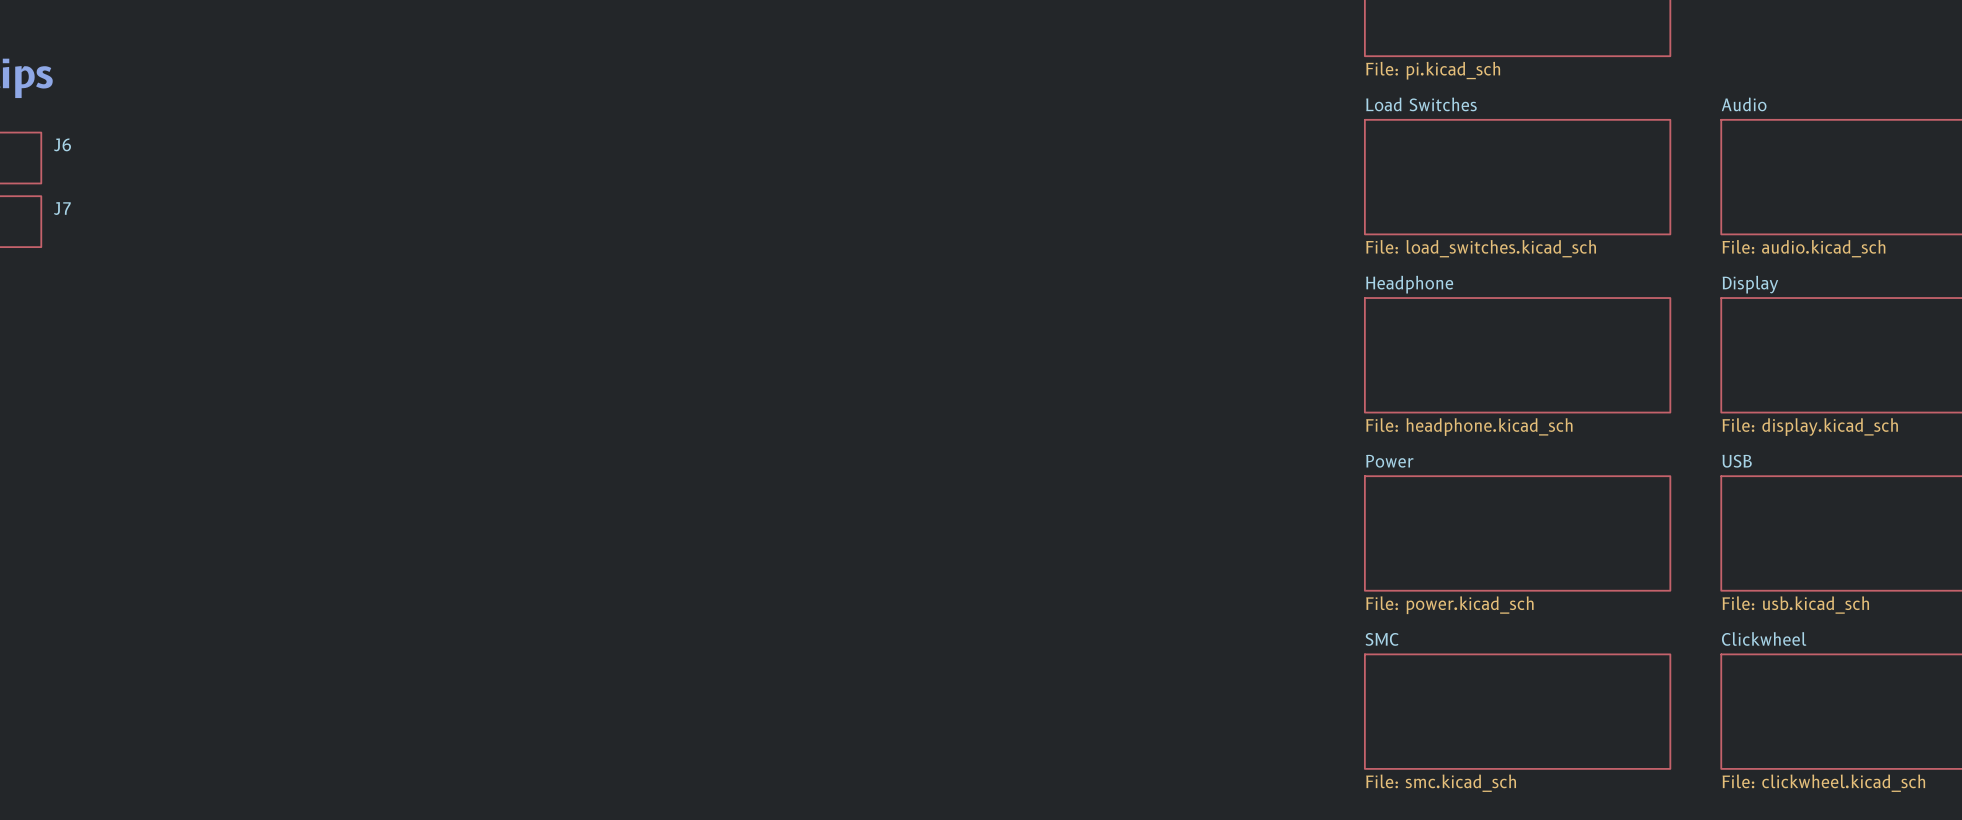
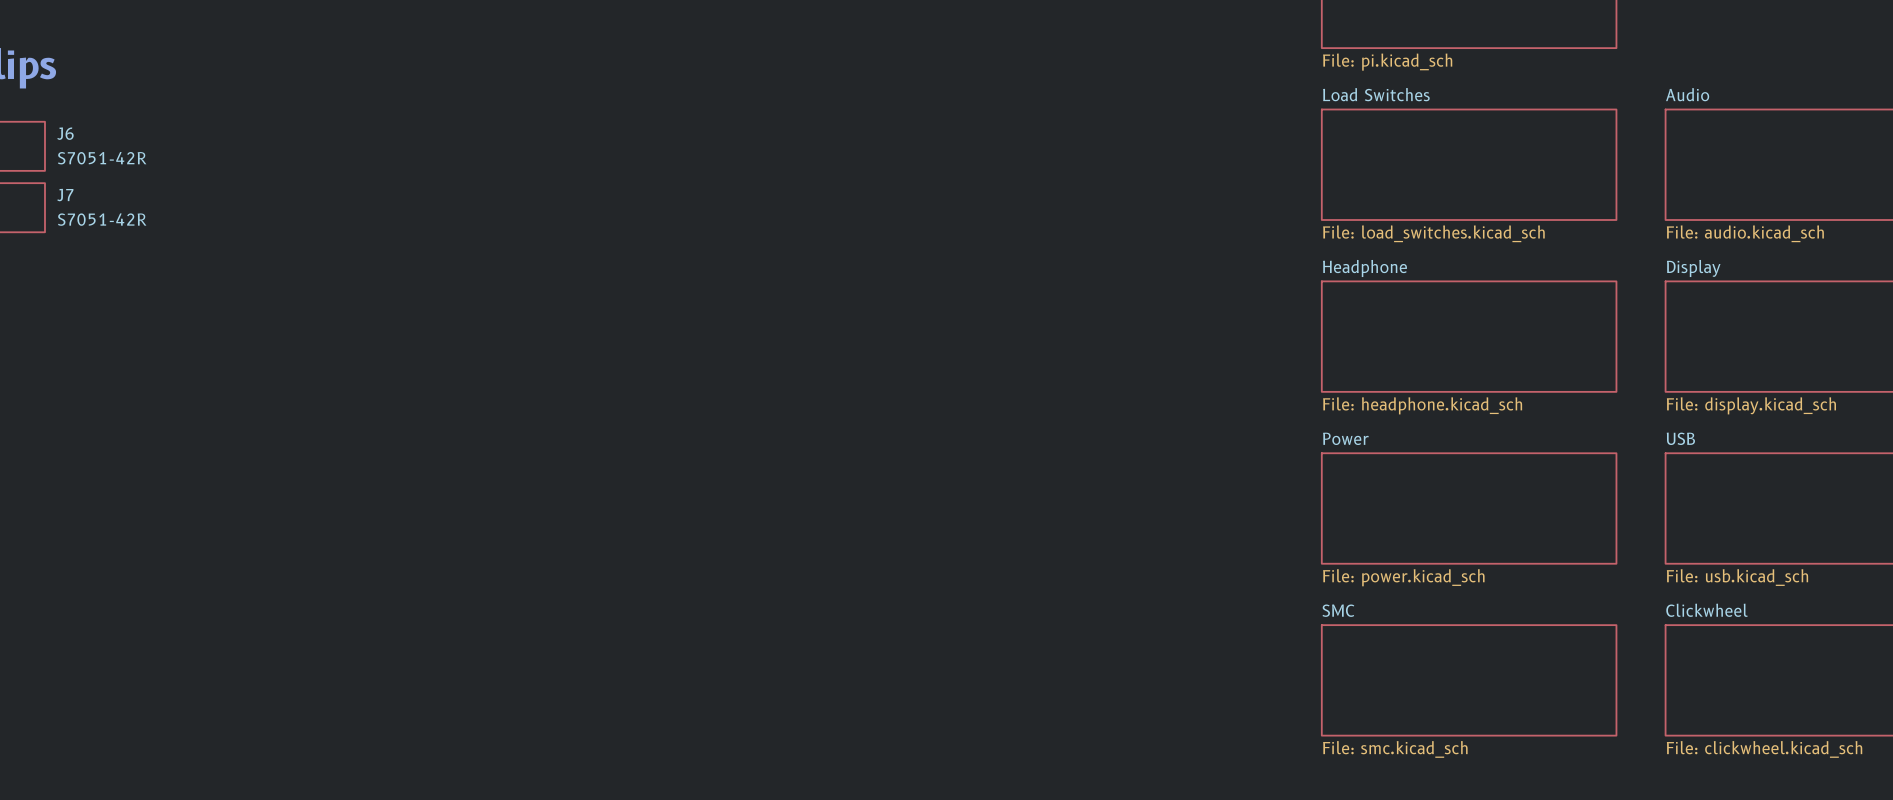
J6 value: none -> S7051-42R (102, 158)
J7 value: none -> S7051-42R (102, 219)

